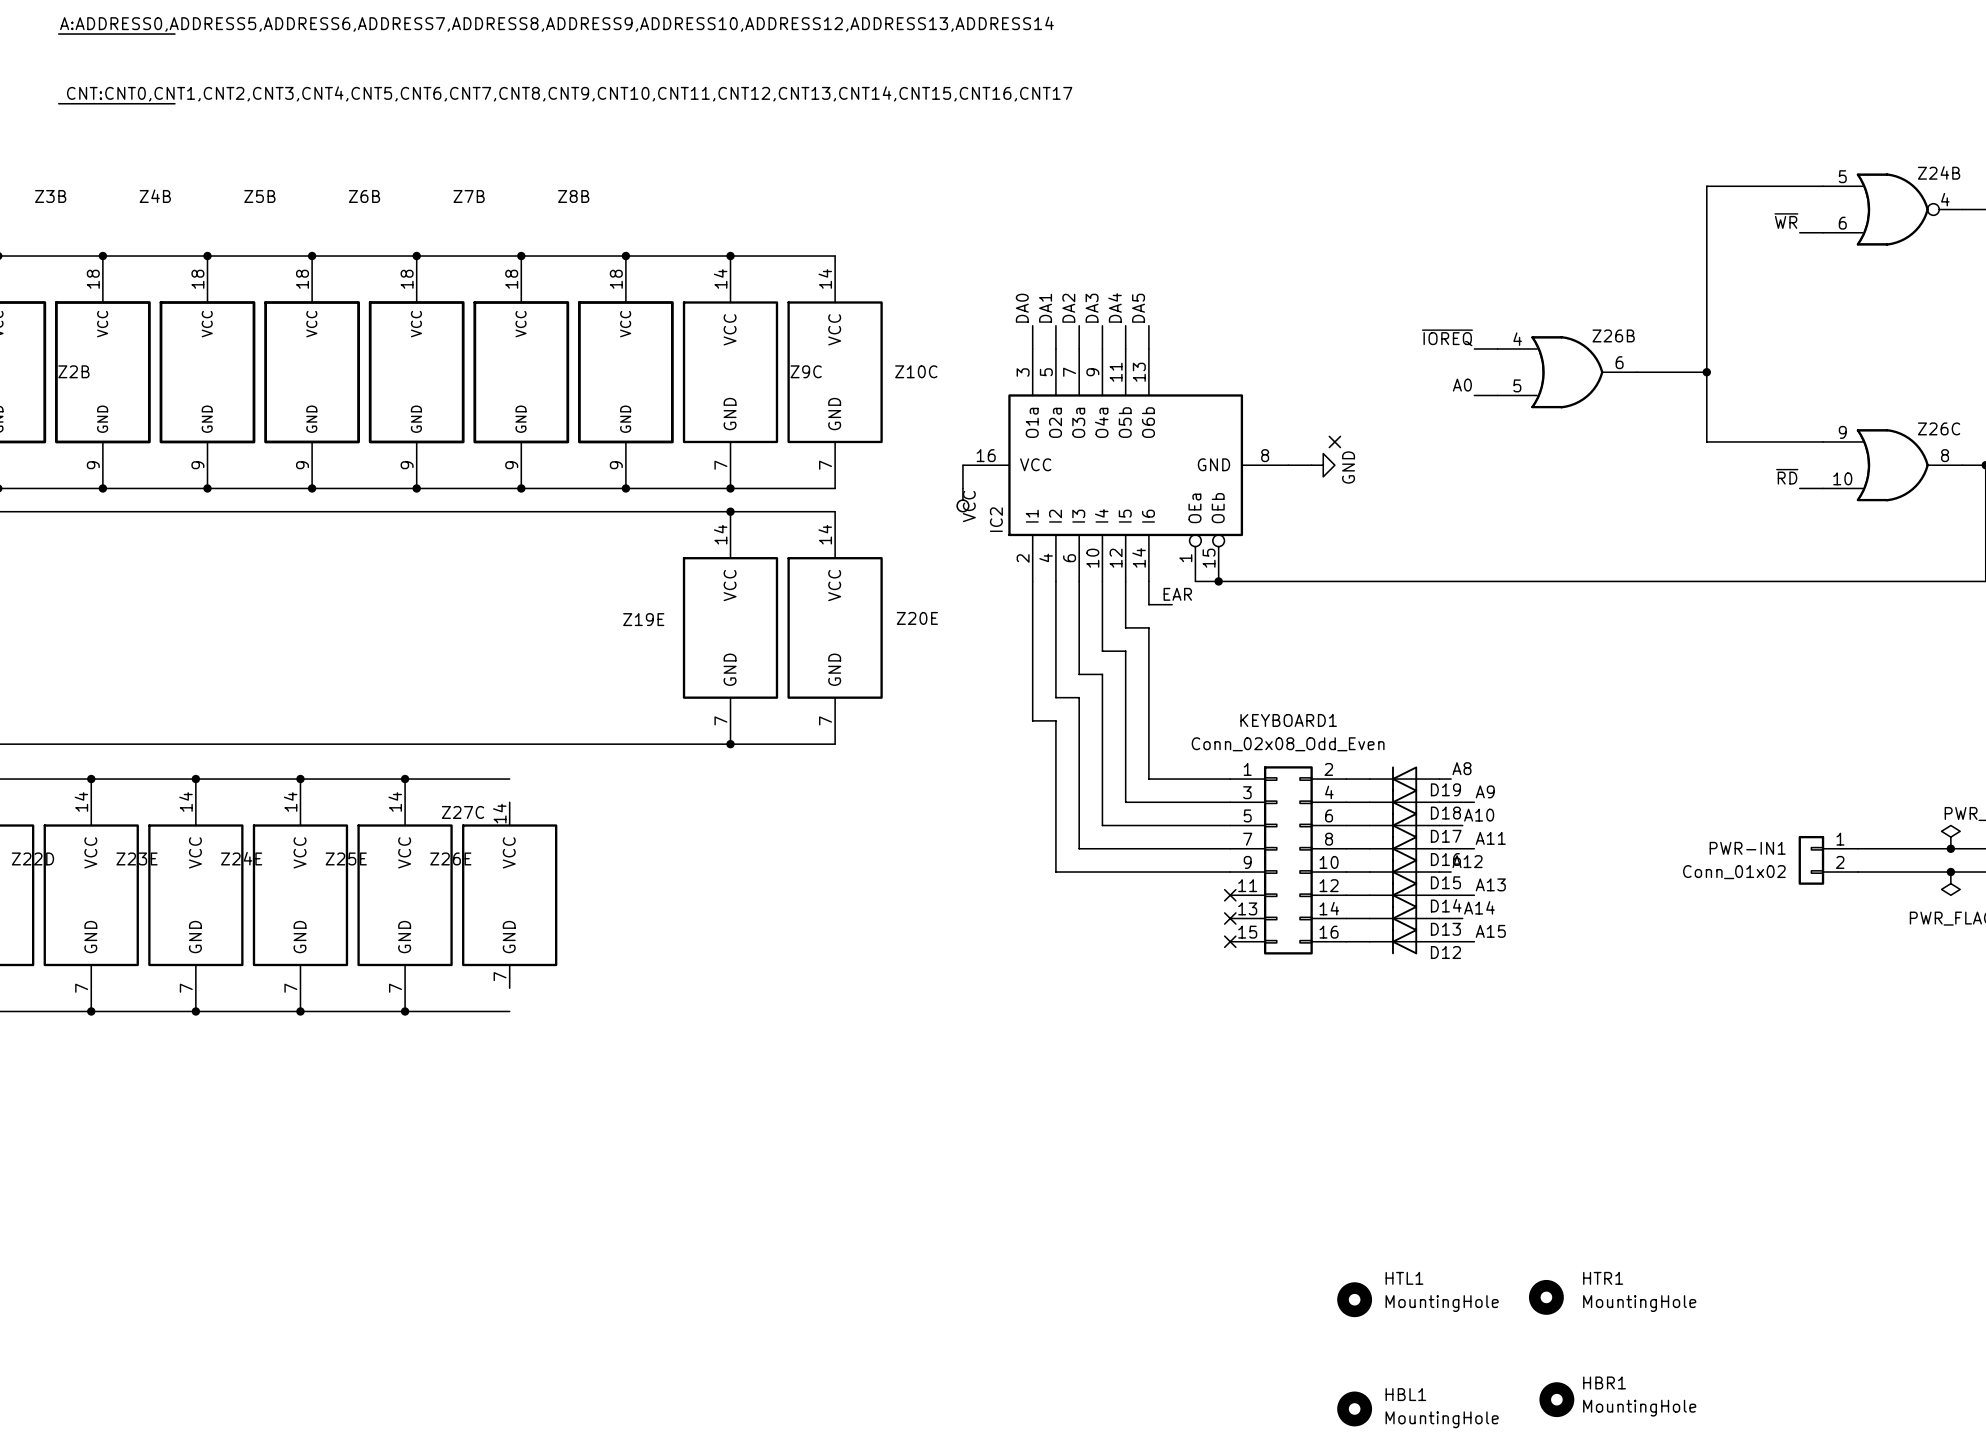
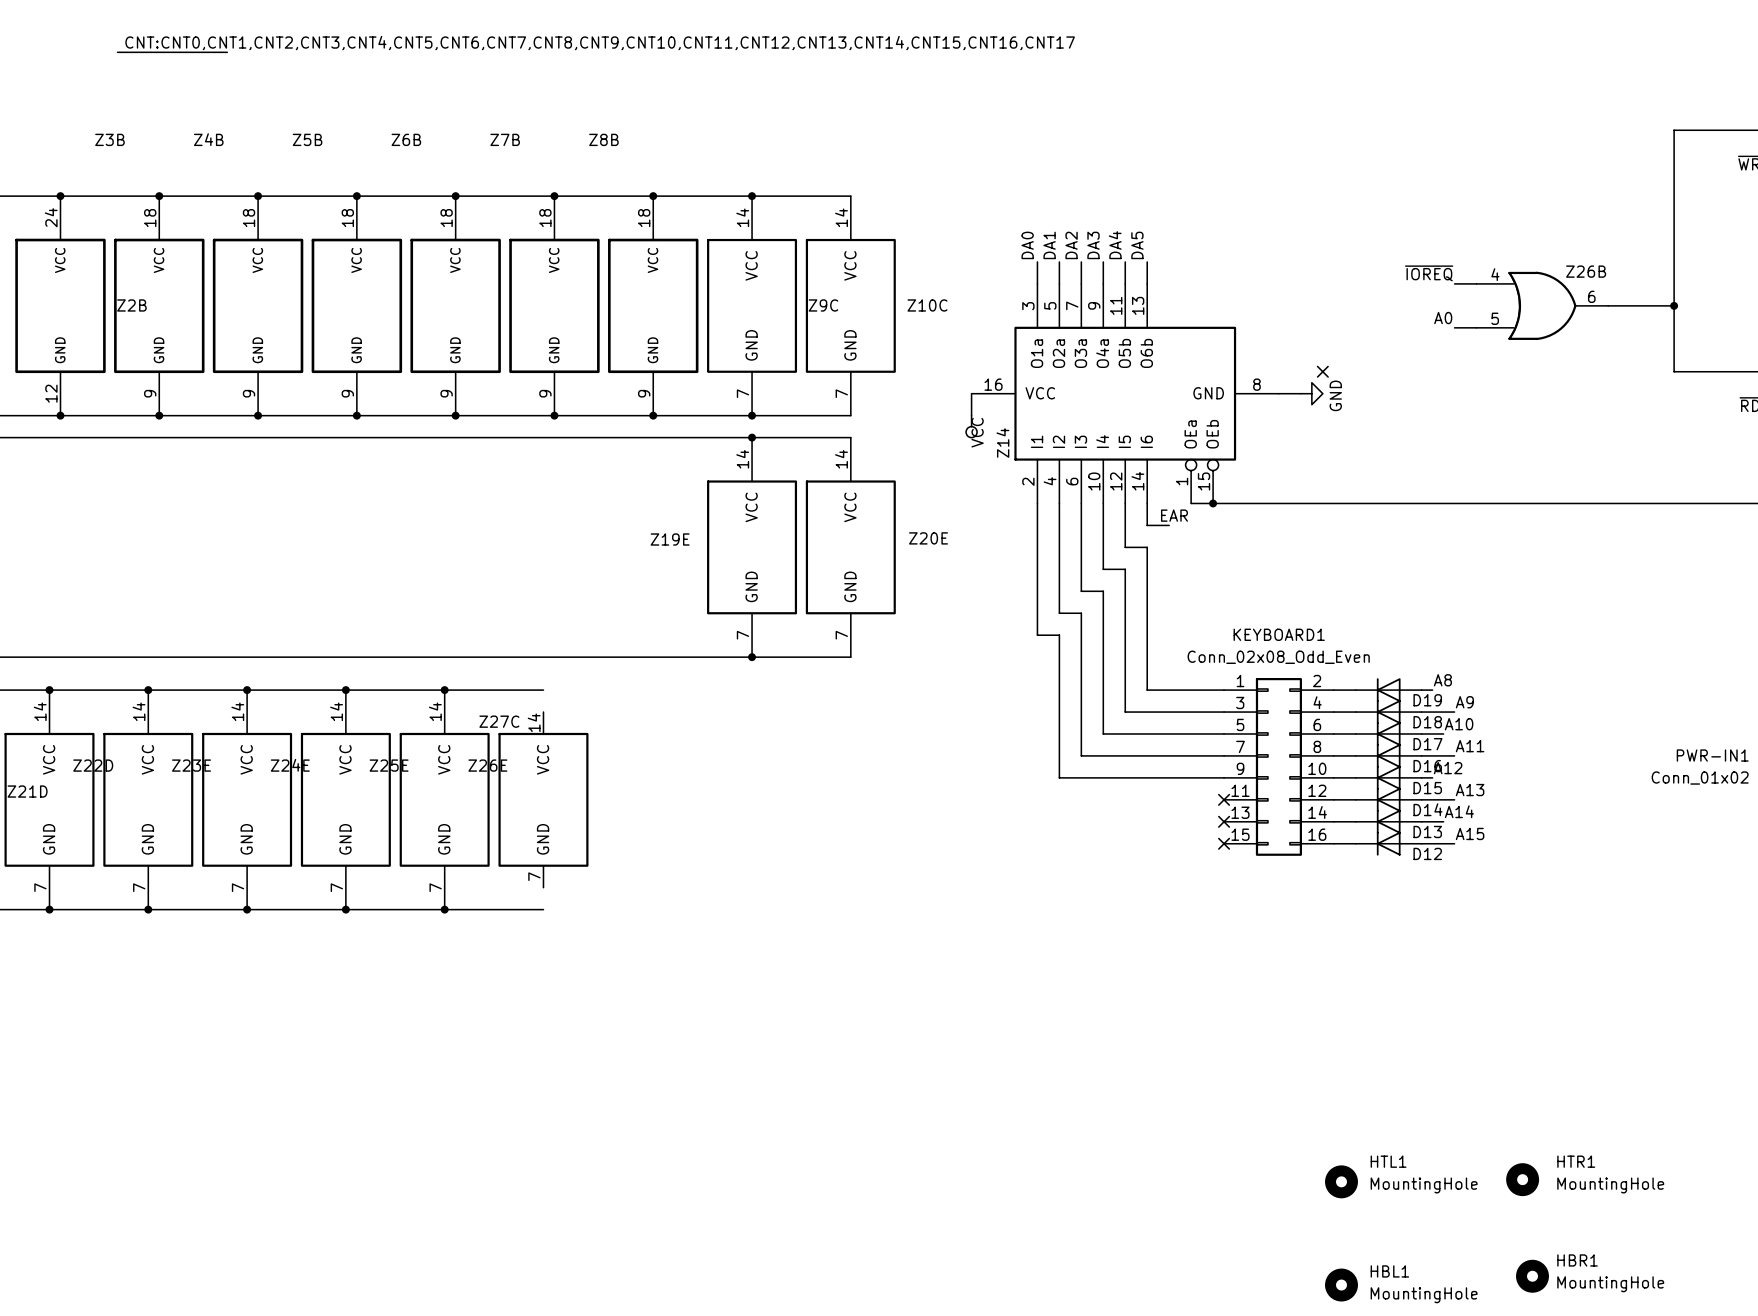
IC2 name: IC2 (996, 519) -> Z14 (1002, 443)

